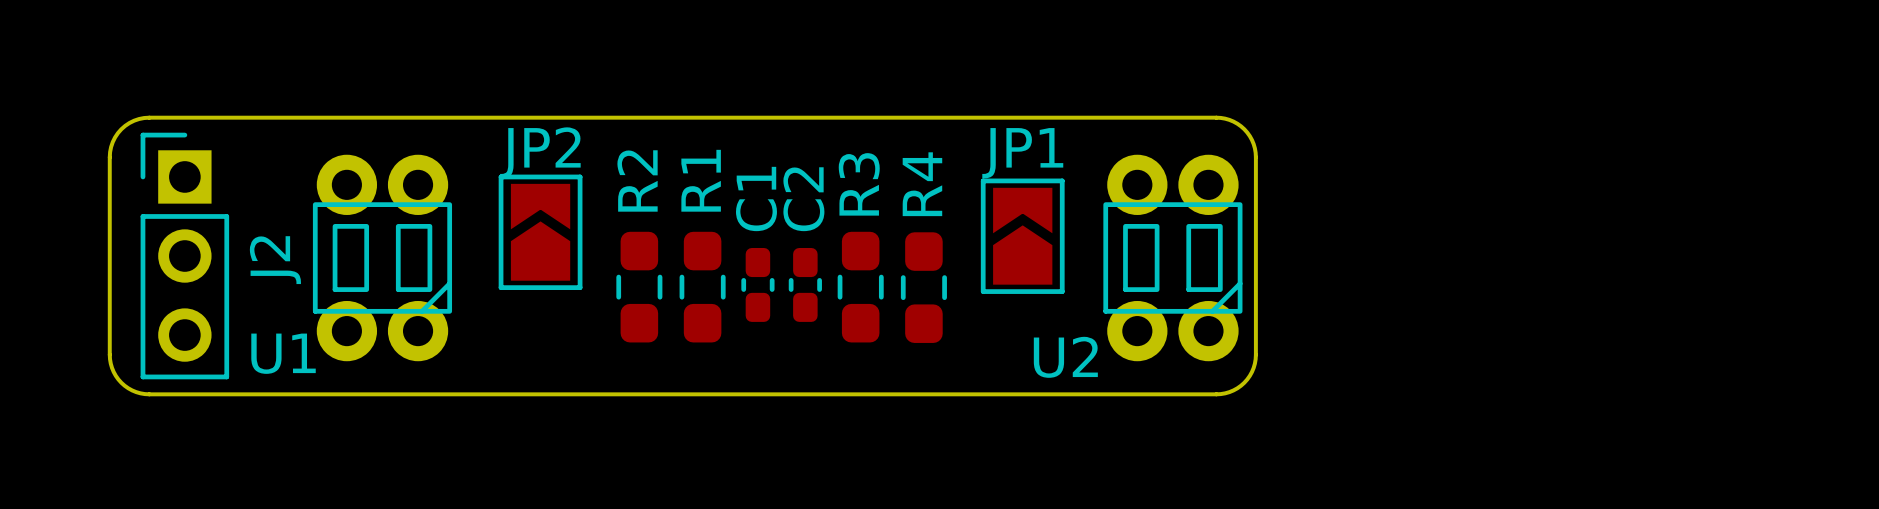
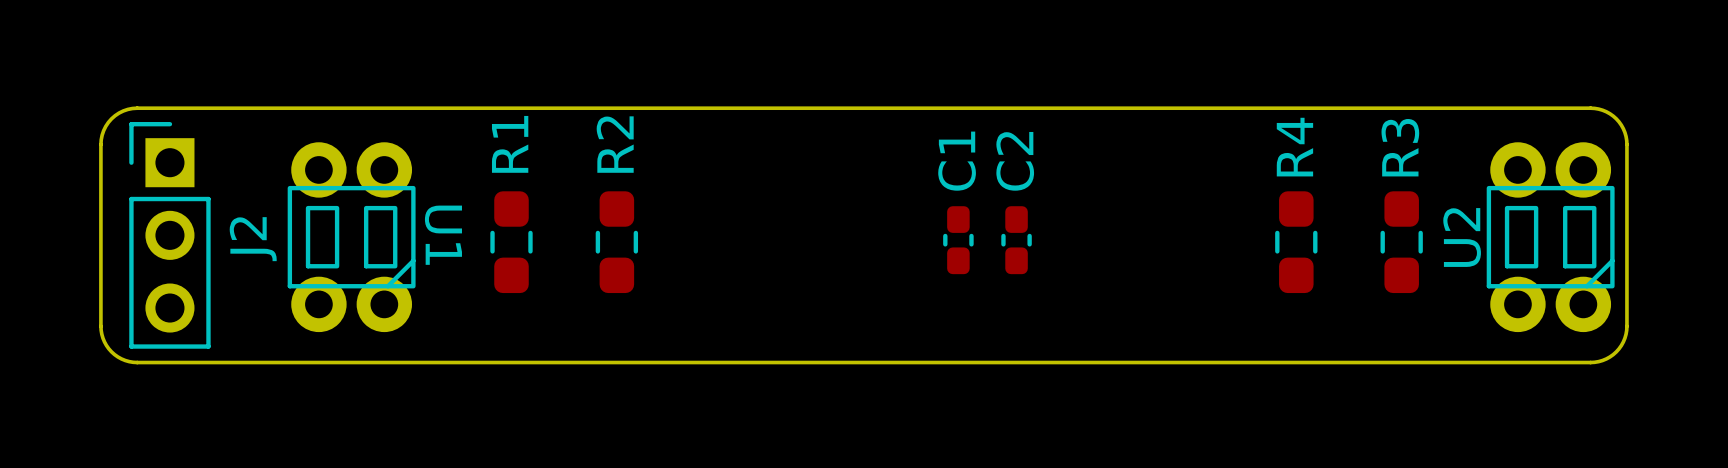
board edge: (1216, 117) (1229, 119) (1244, 129) (1251, 140) (1255, 157) (1255, 359) (1251, 371) (1244, 382) (1233, 390) (1216, 394) -> (1118, 108) (1594, 108) (1606, 111) (1619, 121) (1624, 132) (1626, 144) (1626, 330) (1621, 345) (1606, 358) (1590, 362) (1118, 362)
JP2: (540, 232) -> none
JP1: (1022, 236) -> none
U2 position: (1172, 257) -> (1550, 237)
C1 position: (757, 284) -> (958, 240)
C2 position: (805, 284) -> (1016, 240)
R2 position: (639, 287) -> (616, 242)
R1 position: (702, 287) -> (511, 242)
R3 position: (860, 287) -> (1401, 242)
R4 position: (923, 287) -> (1296, 242)
U1 name rotation: 0° (283, 353) -> 90° clockwise (443, 235)
U1 name position: U1 (283, 353) -> U1 (443, 235)
U2 name rotation: 0° (1065, 357) -> 90° counterclockwise (1462, 237)
U2 name position: U2 (1065, 357) -> U2 (1462, 237)

